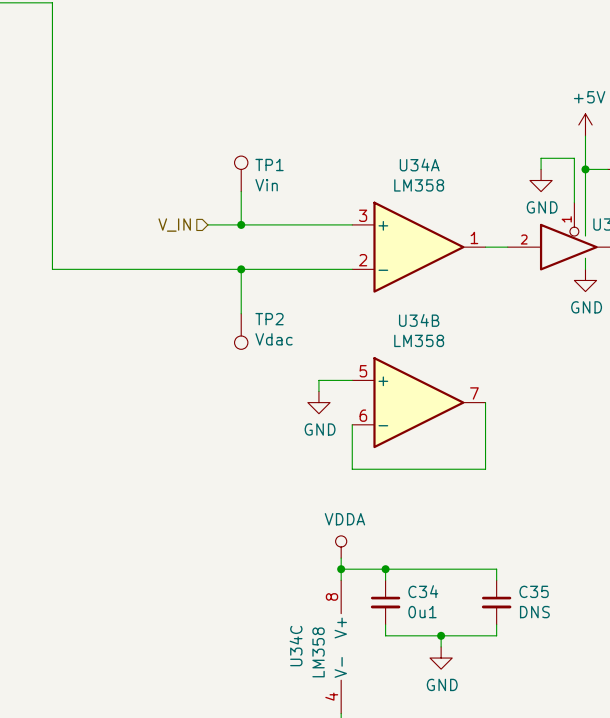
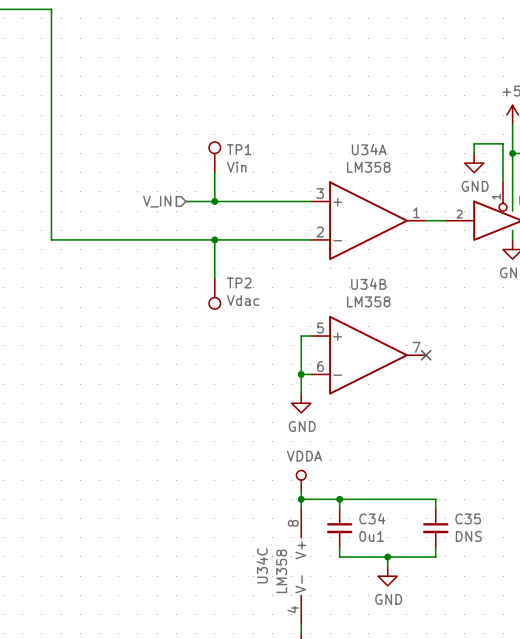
wire: (341, 380) (318, 380) (318, 391) -> (301, 336) (301, 393)
power symbol position: GND (318, 402) -> GND (301, 403)
wire: (485, 402) (485, 469) (352, 469) (352, 424) -> (301, 374) (310, 374)
no-connect mark: none -> (426, 355)
junction: none -> (301, 374)

